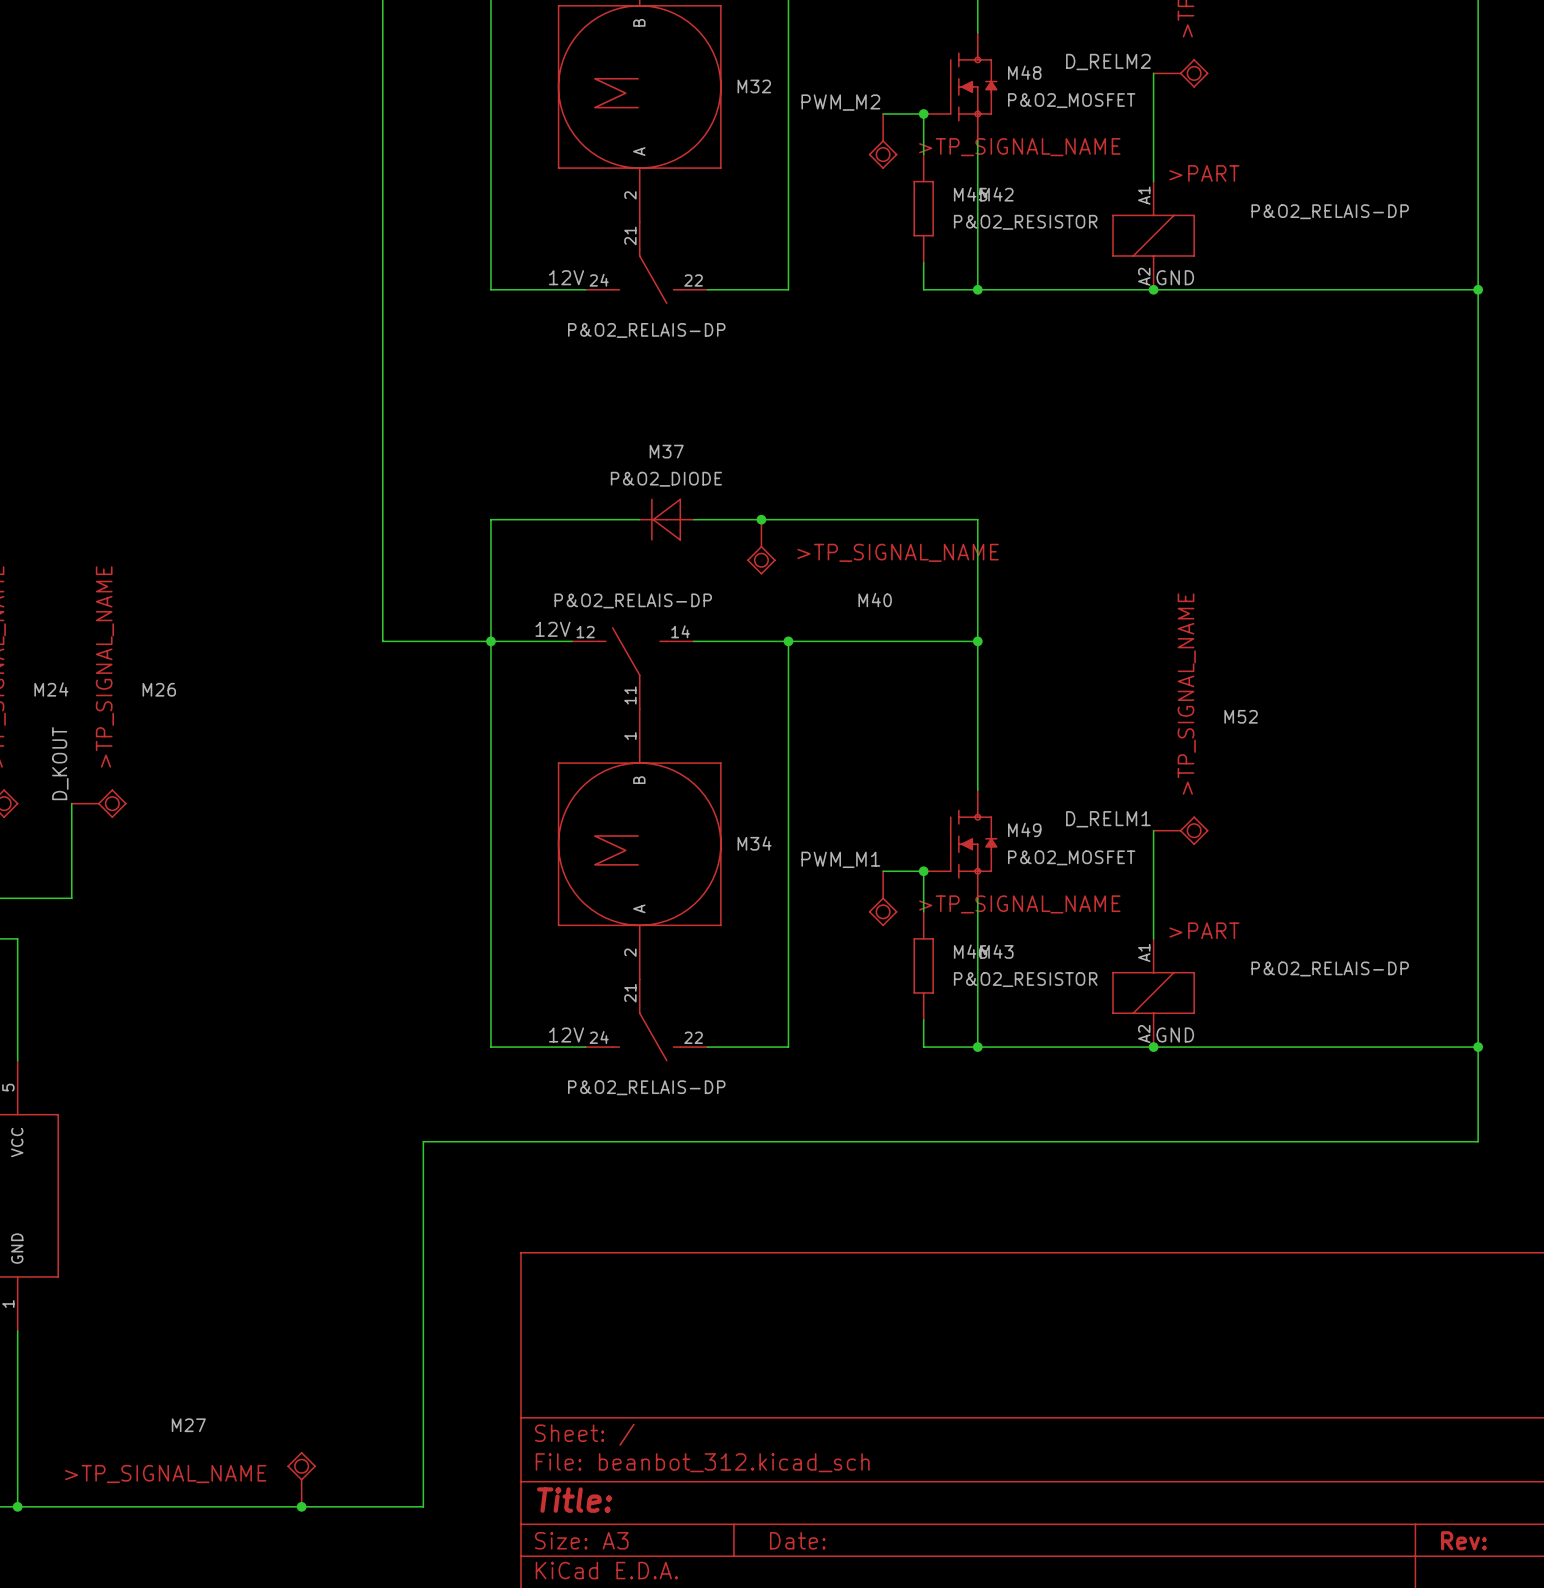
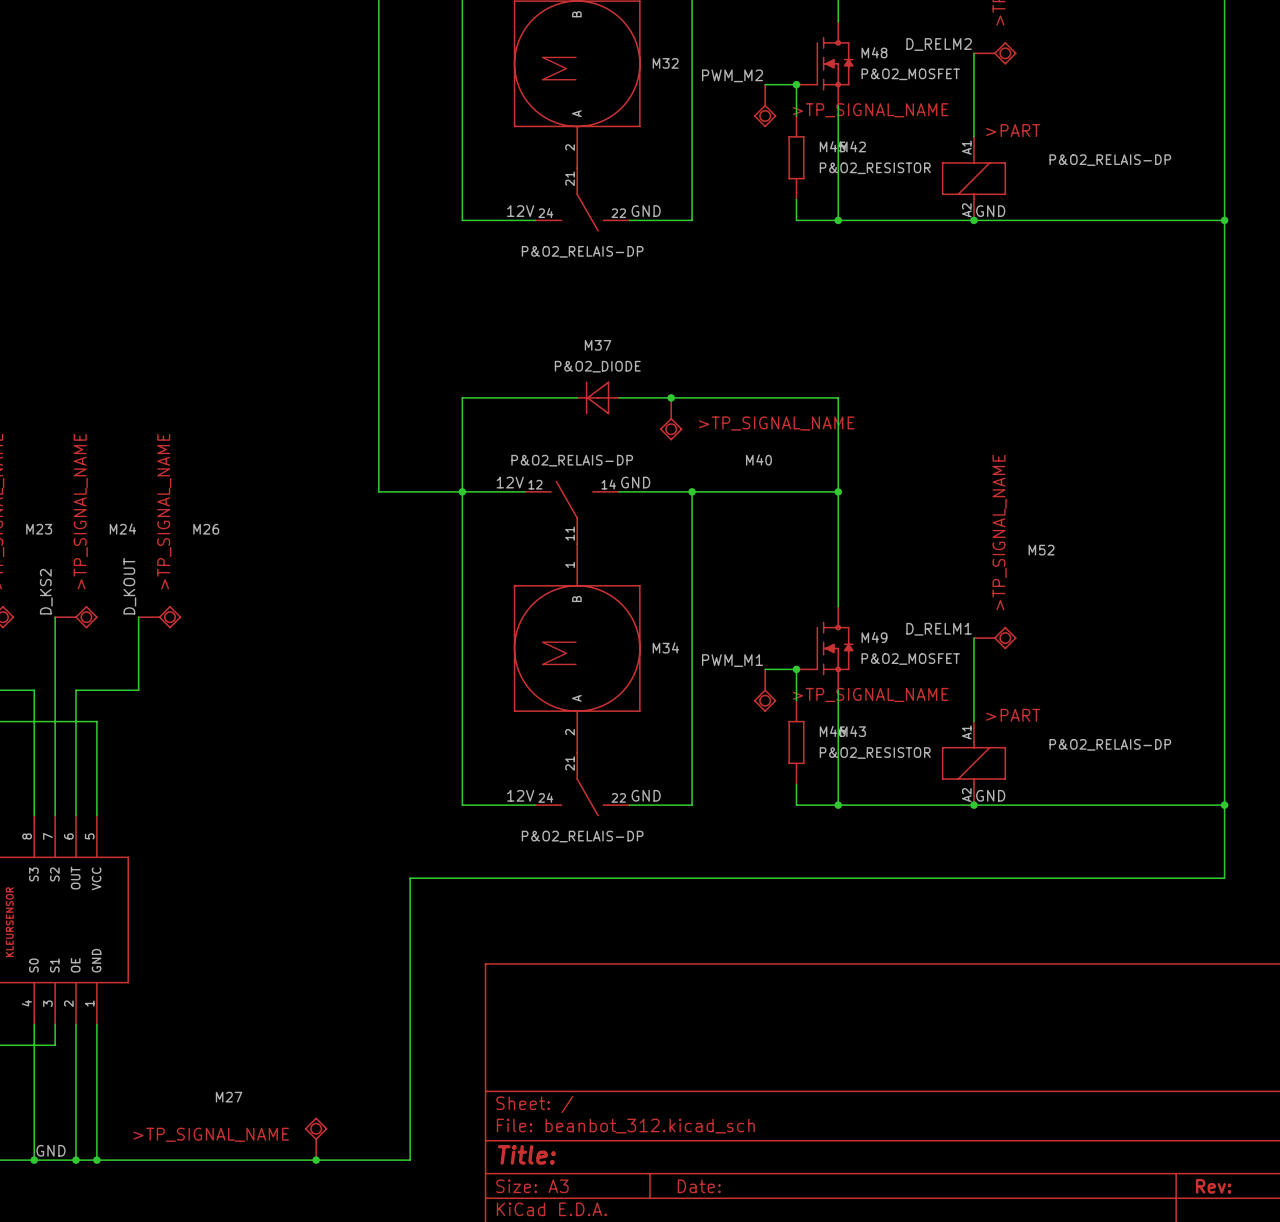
label: none -> GND (646, 211)
label: none -> GND (635, 482)
label: none -> GND (646, 795)

